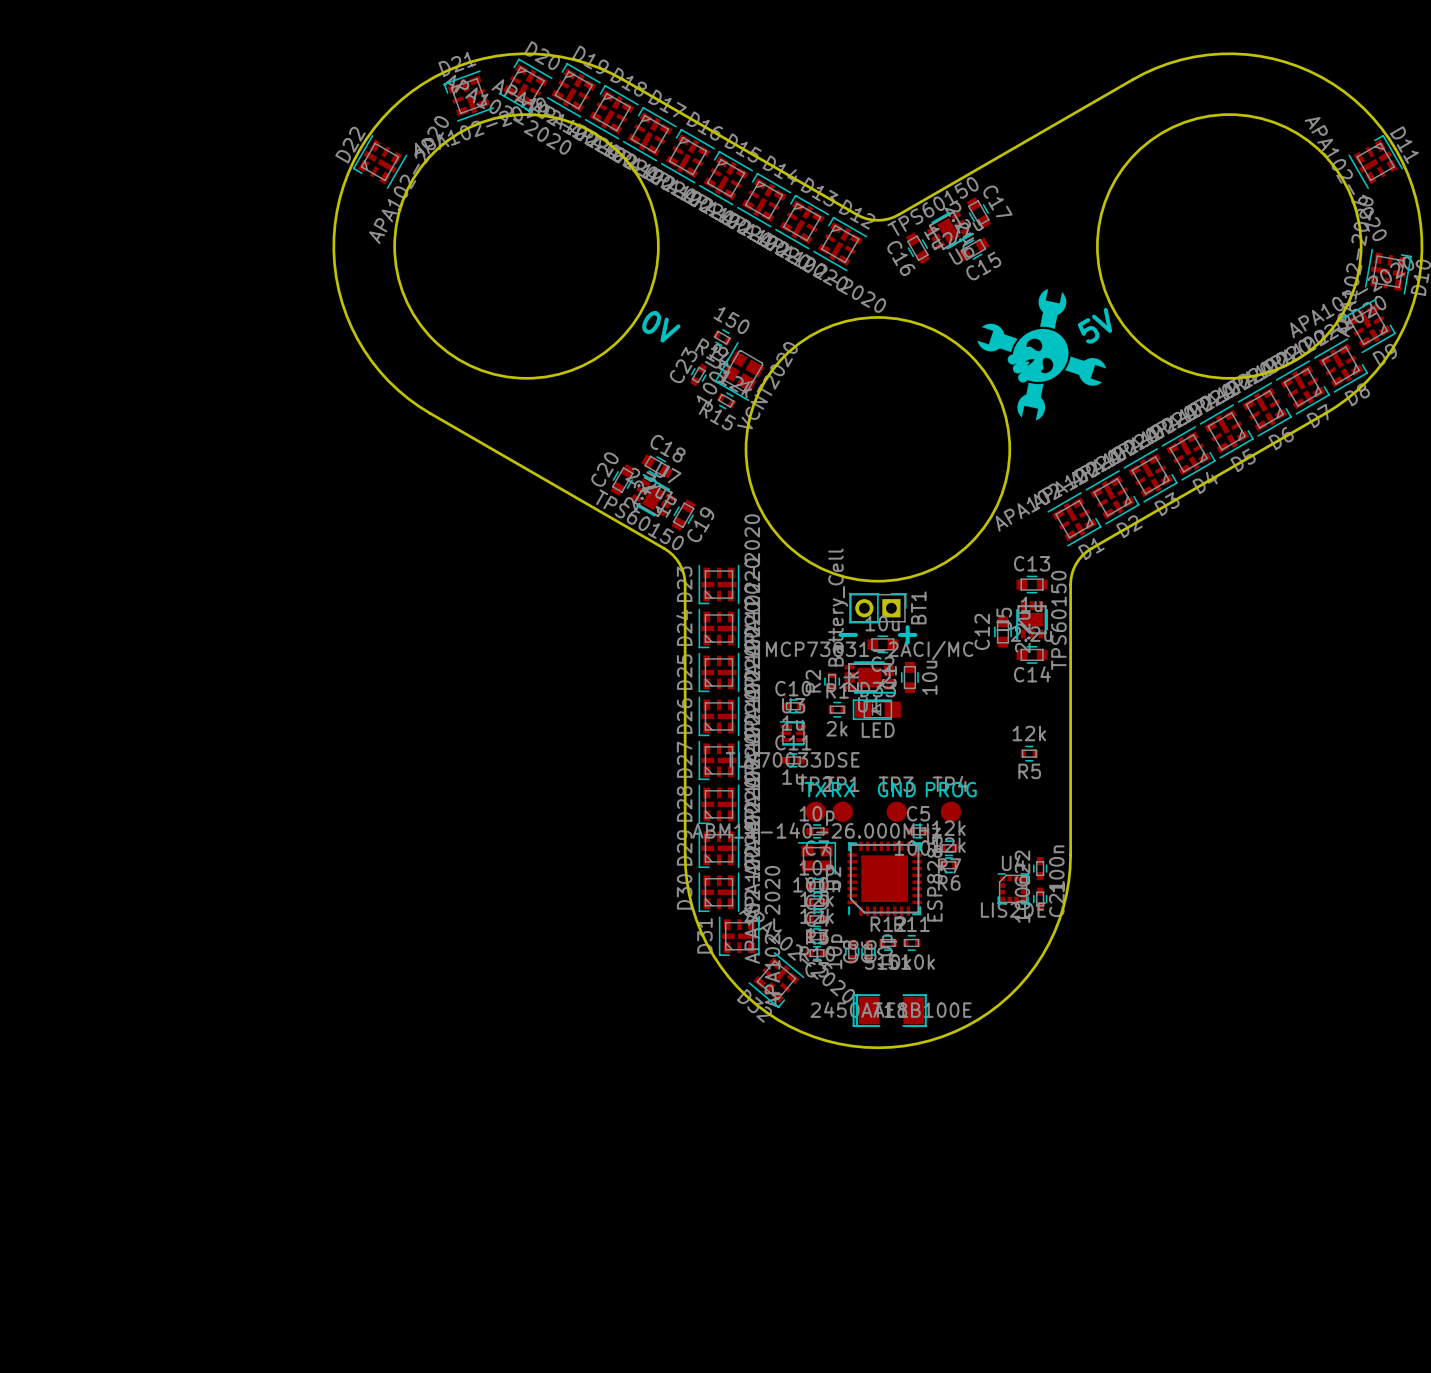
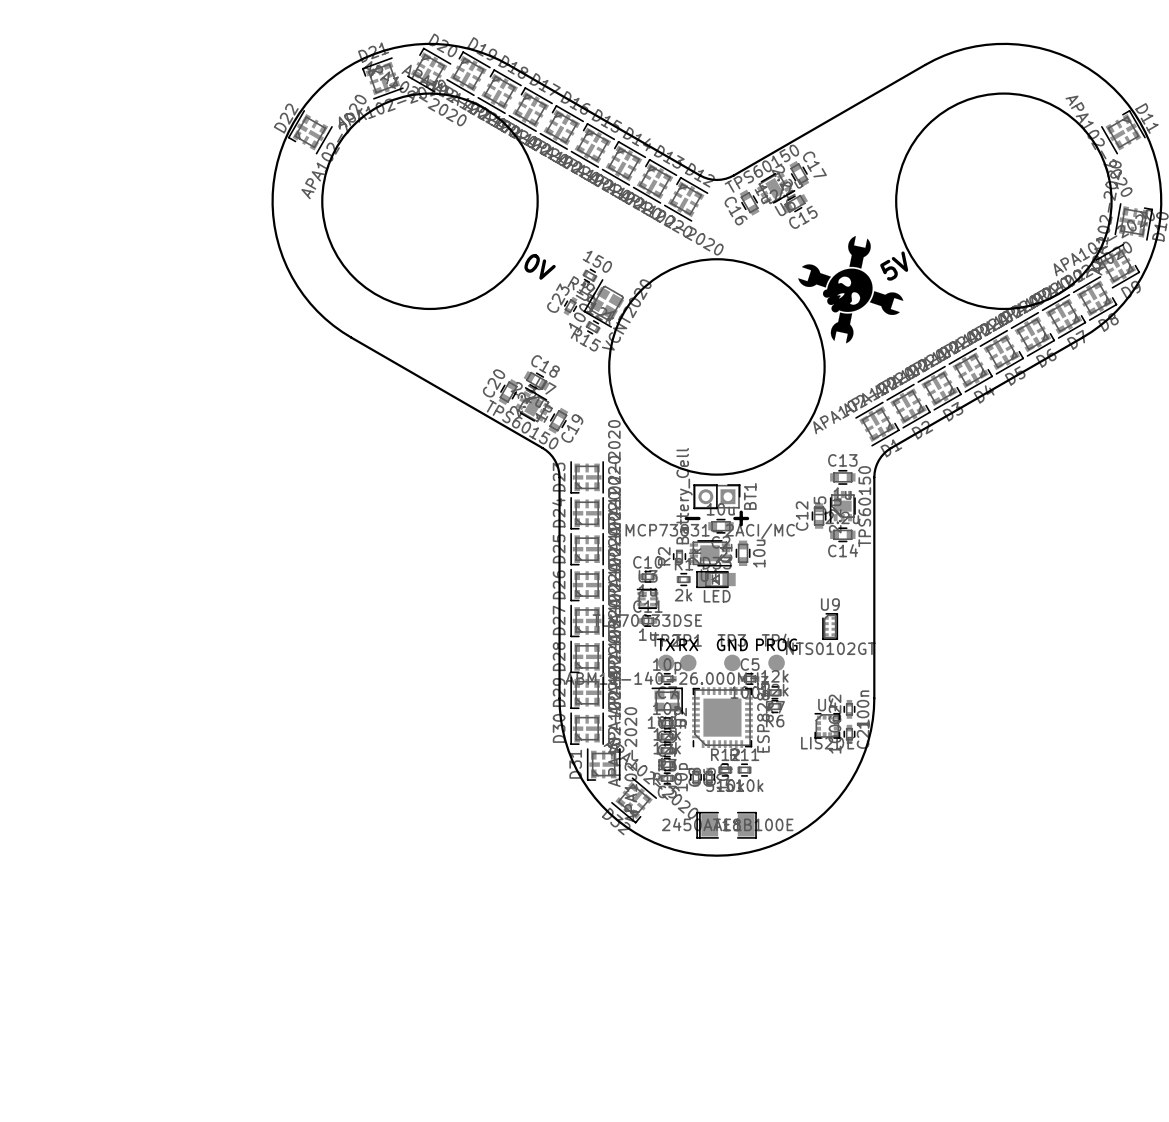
R5: 12k (1029, 753) -> none
U9: none -> NTS0102GT (830, 626)

